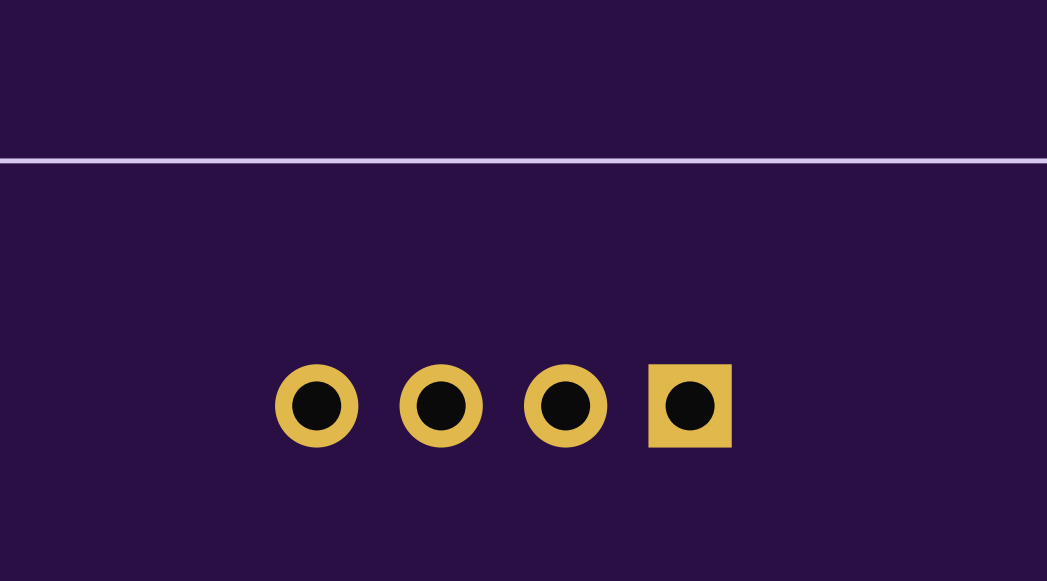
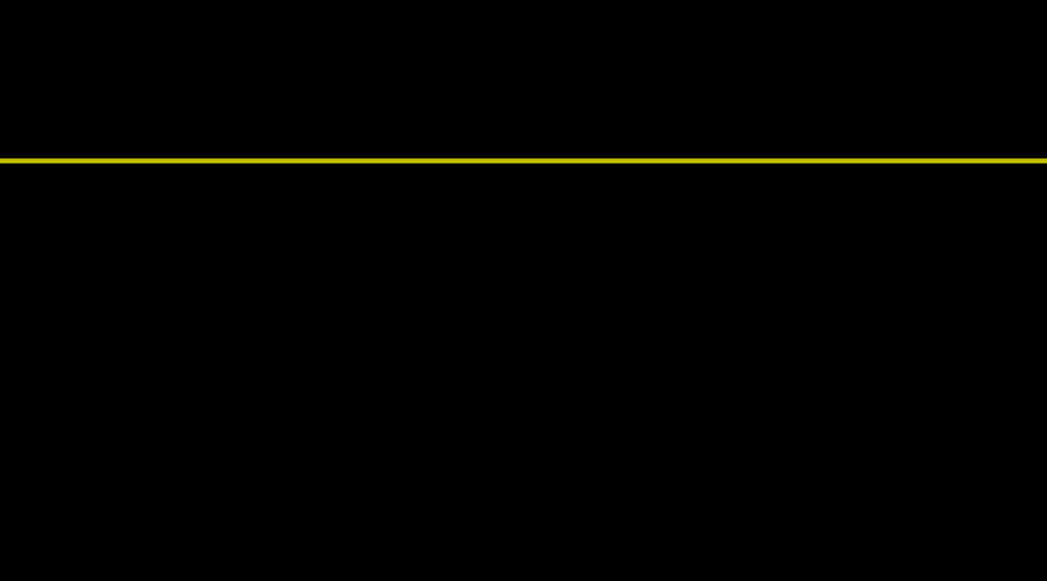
part: (503, 405) -> none

